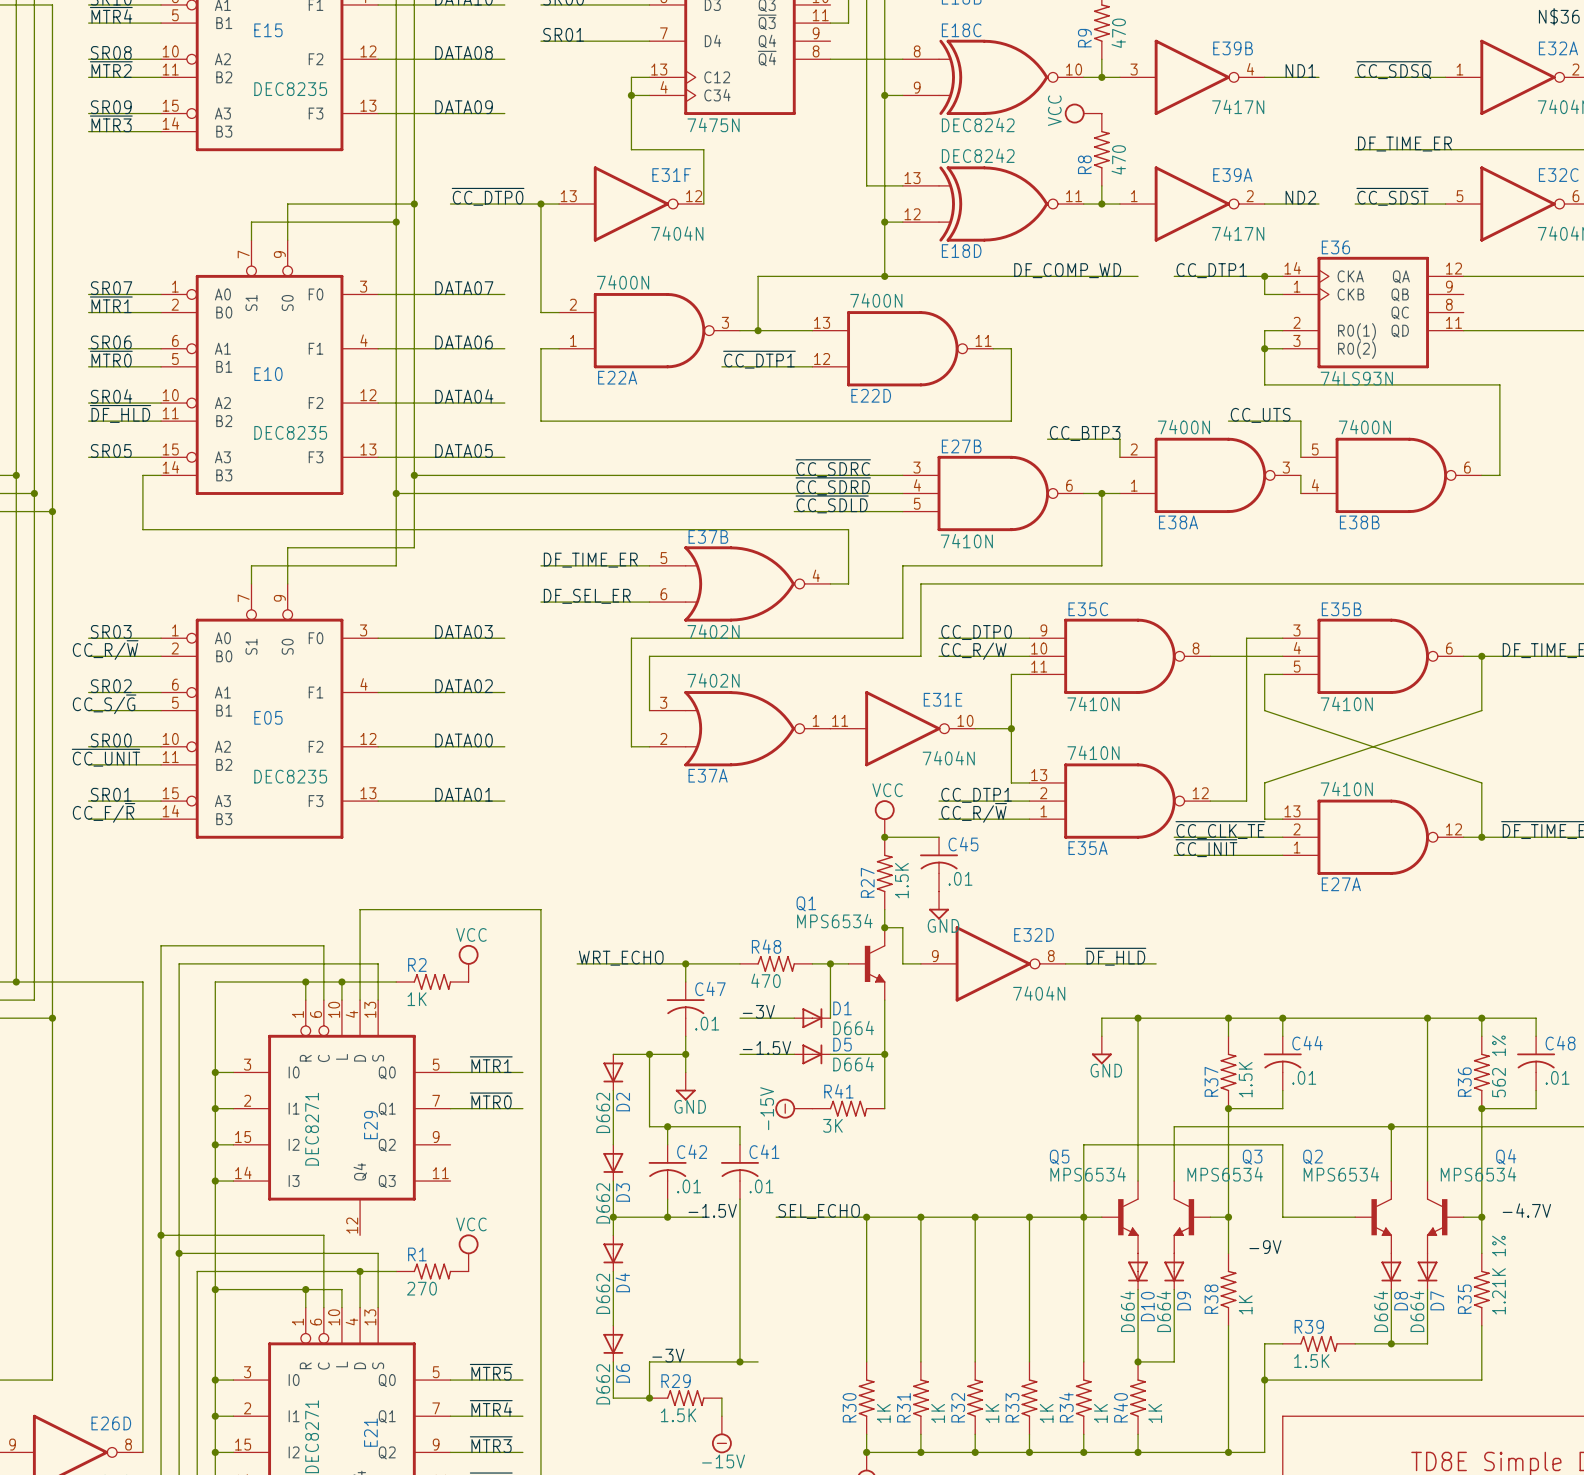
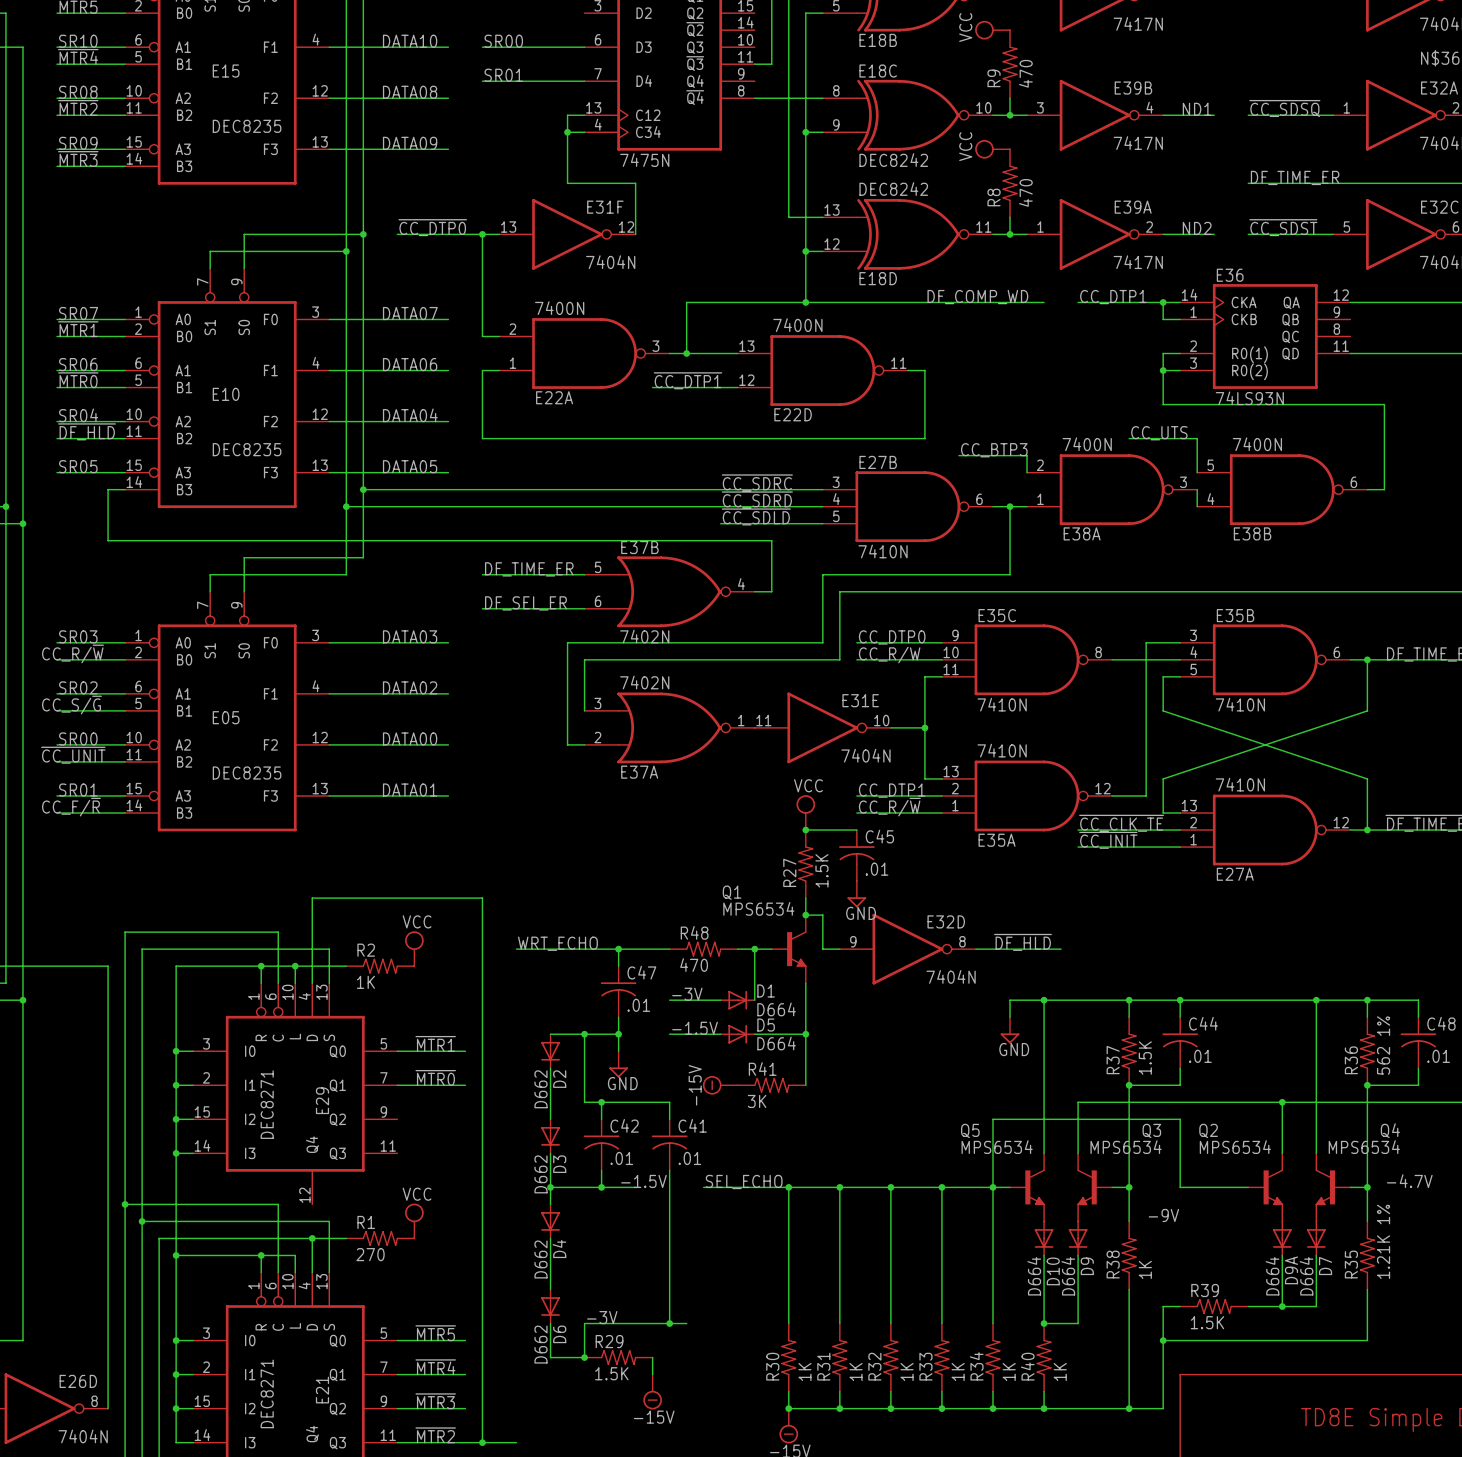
D8 name: D8 (1401, 1301) -> D9A (1291, 1270)

